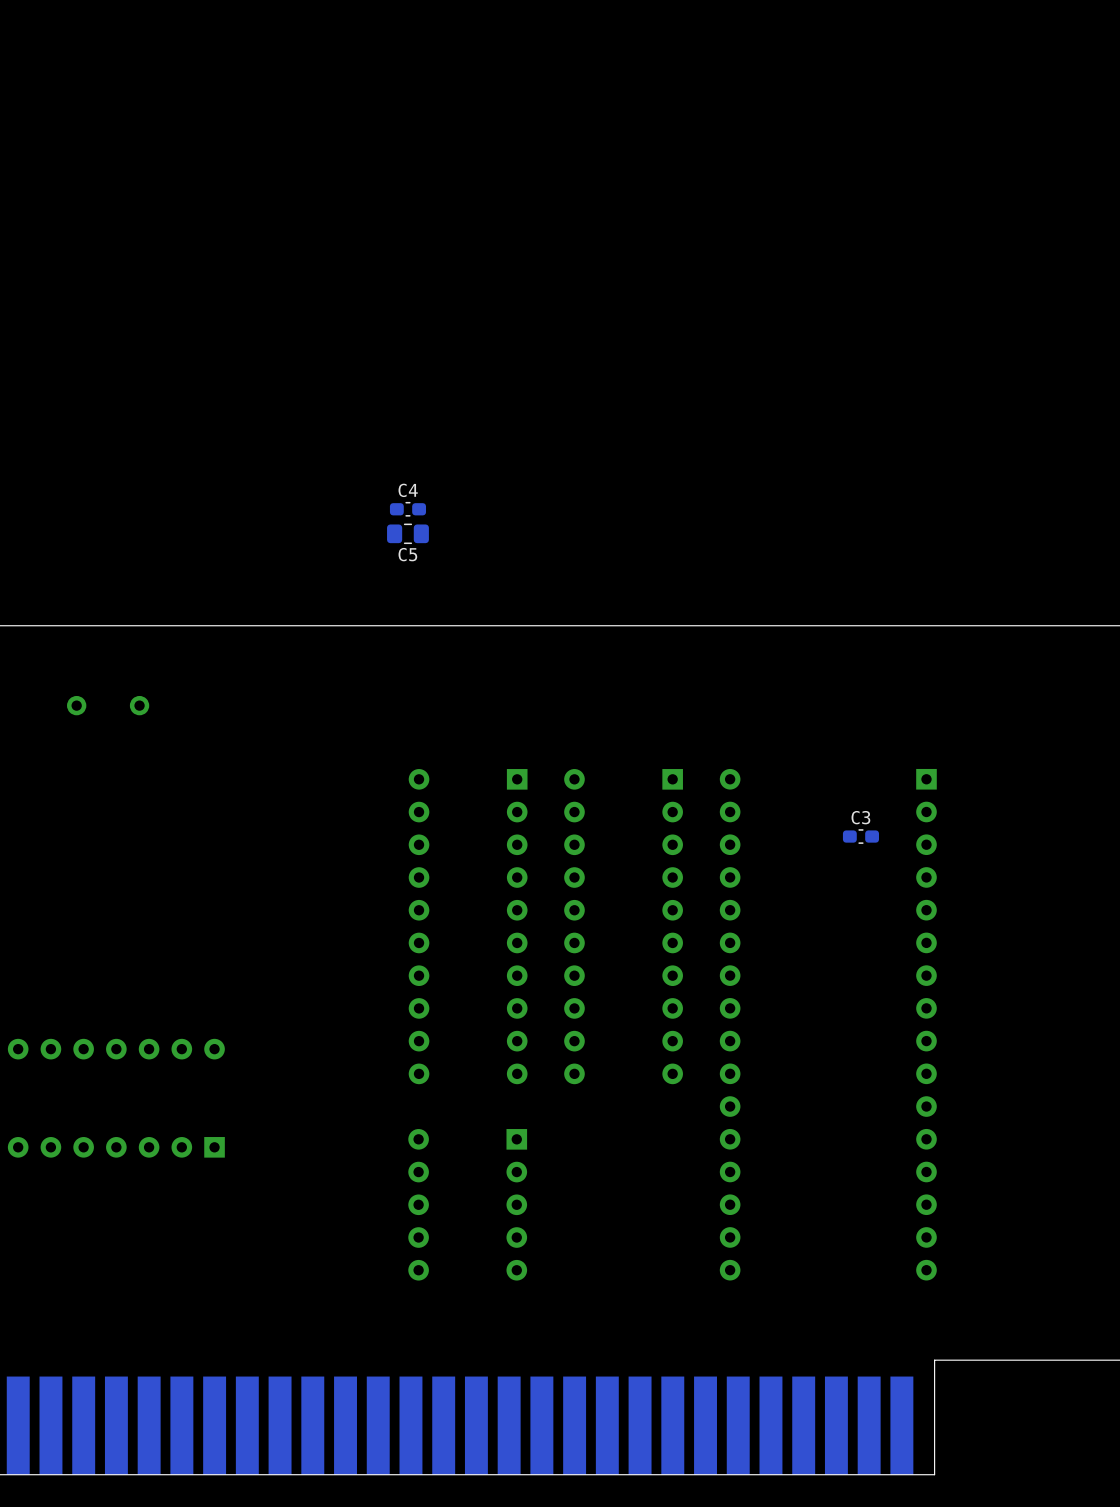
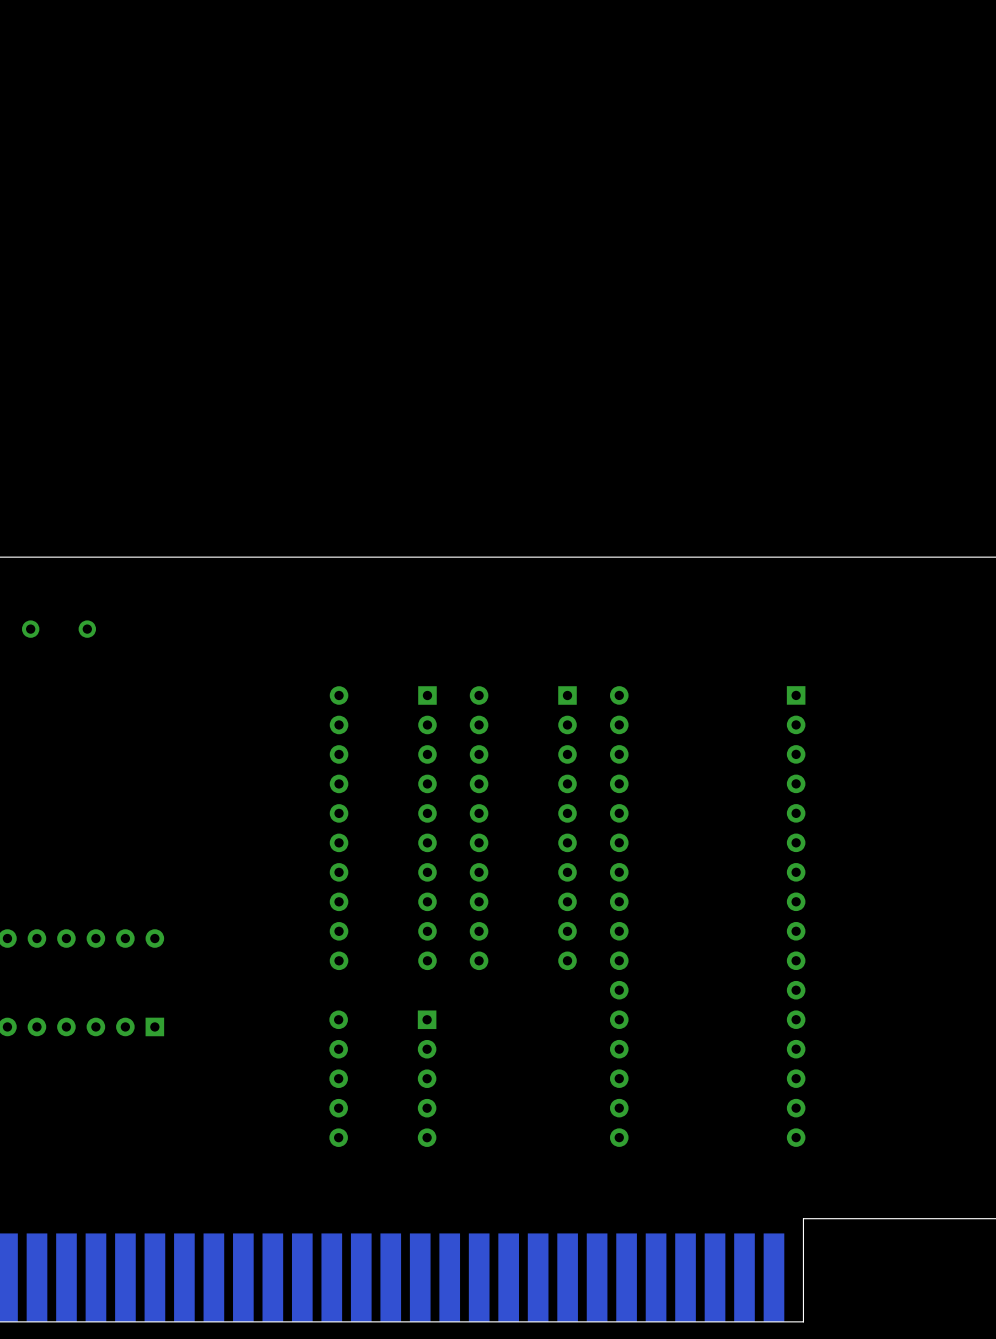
C4: (407, 509) -> none
C5: (407, 533) -> none
C3: (860, 836) -> none

